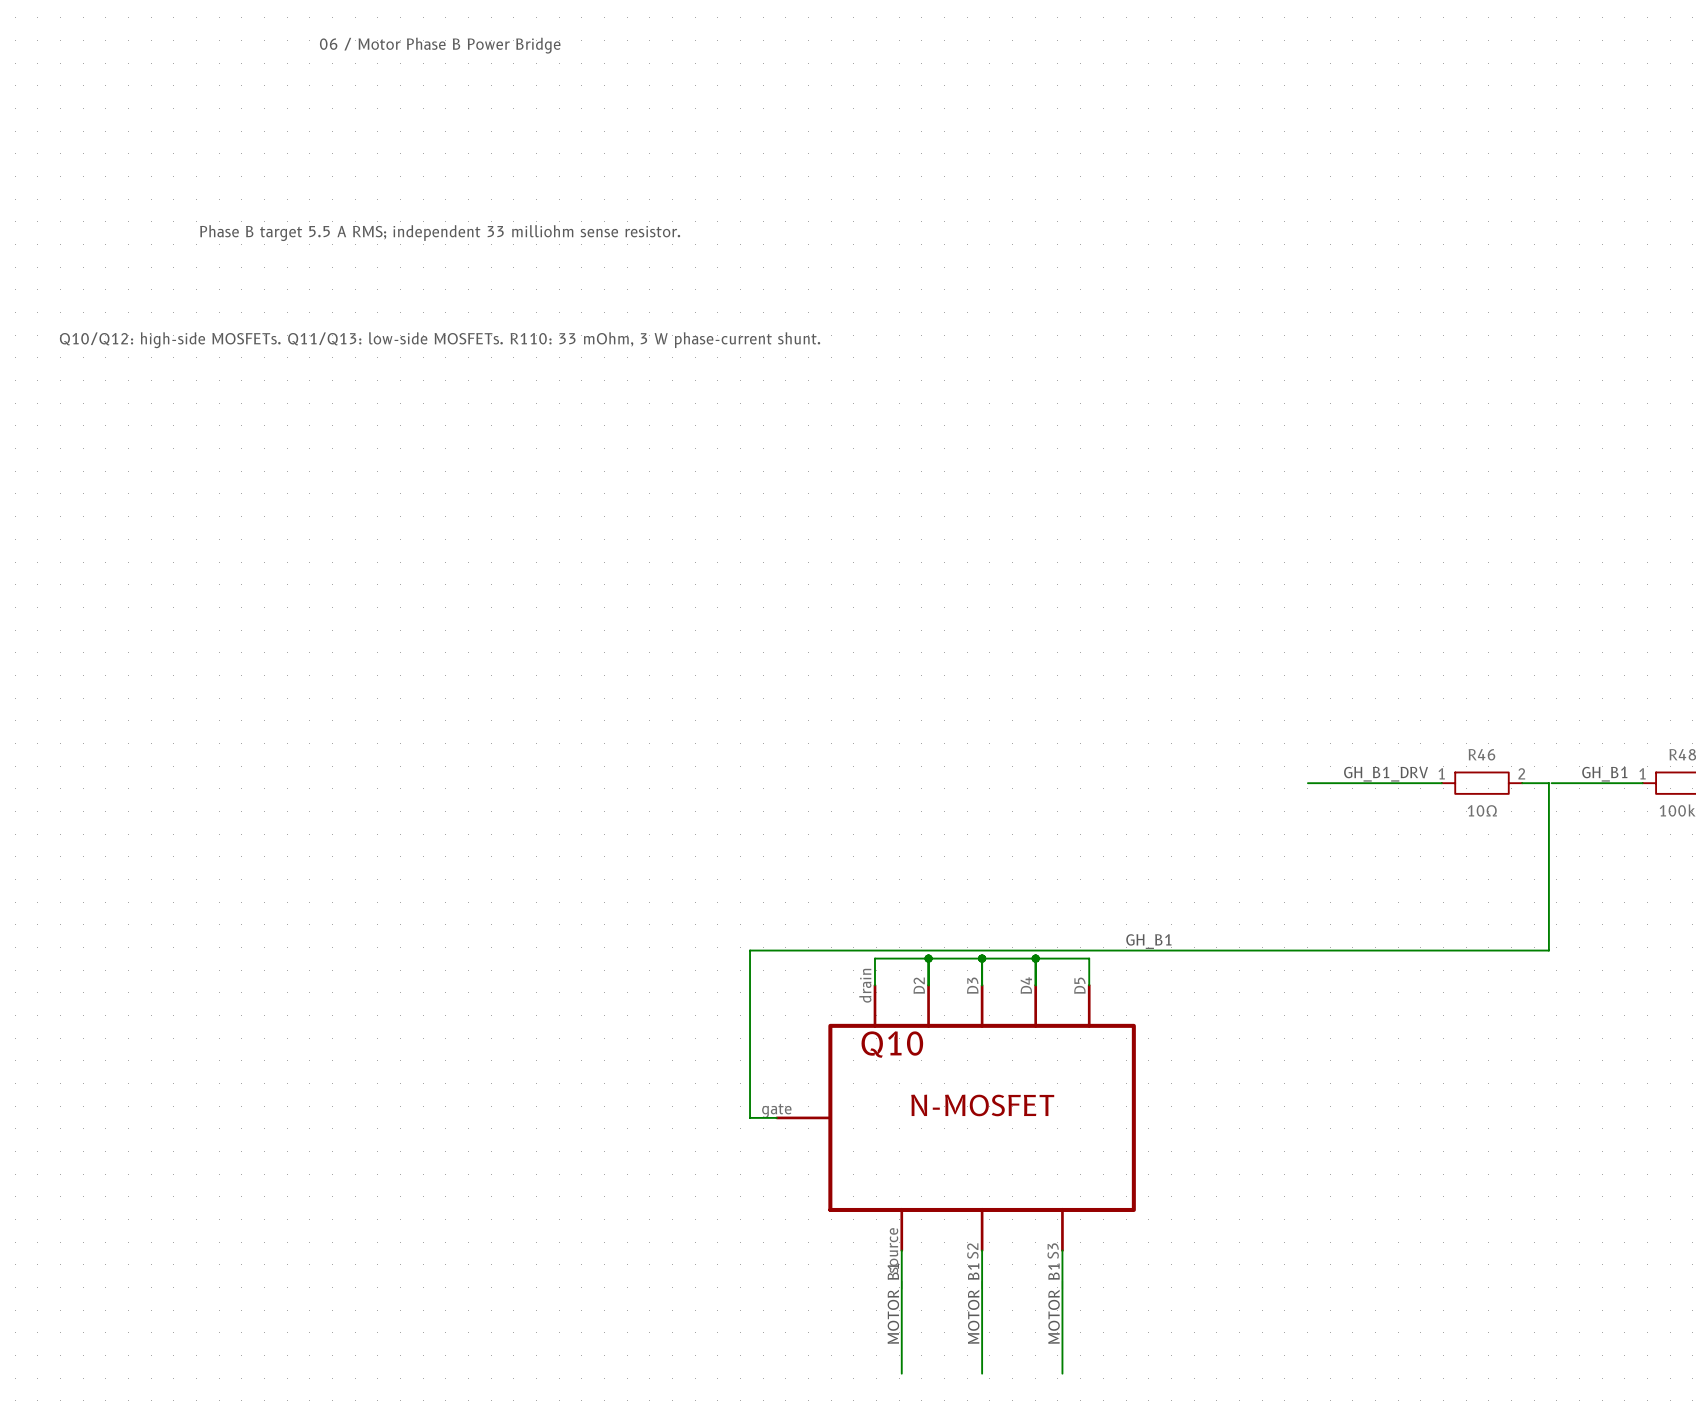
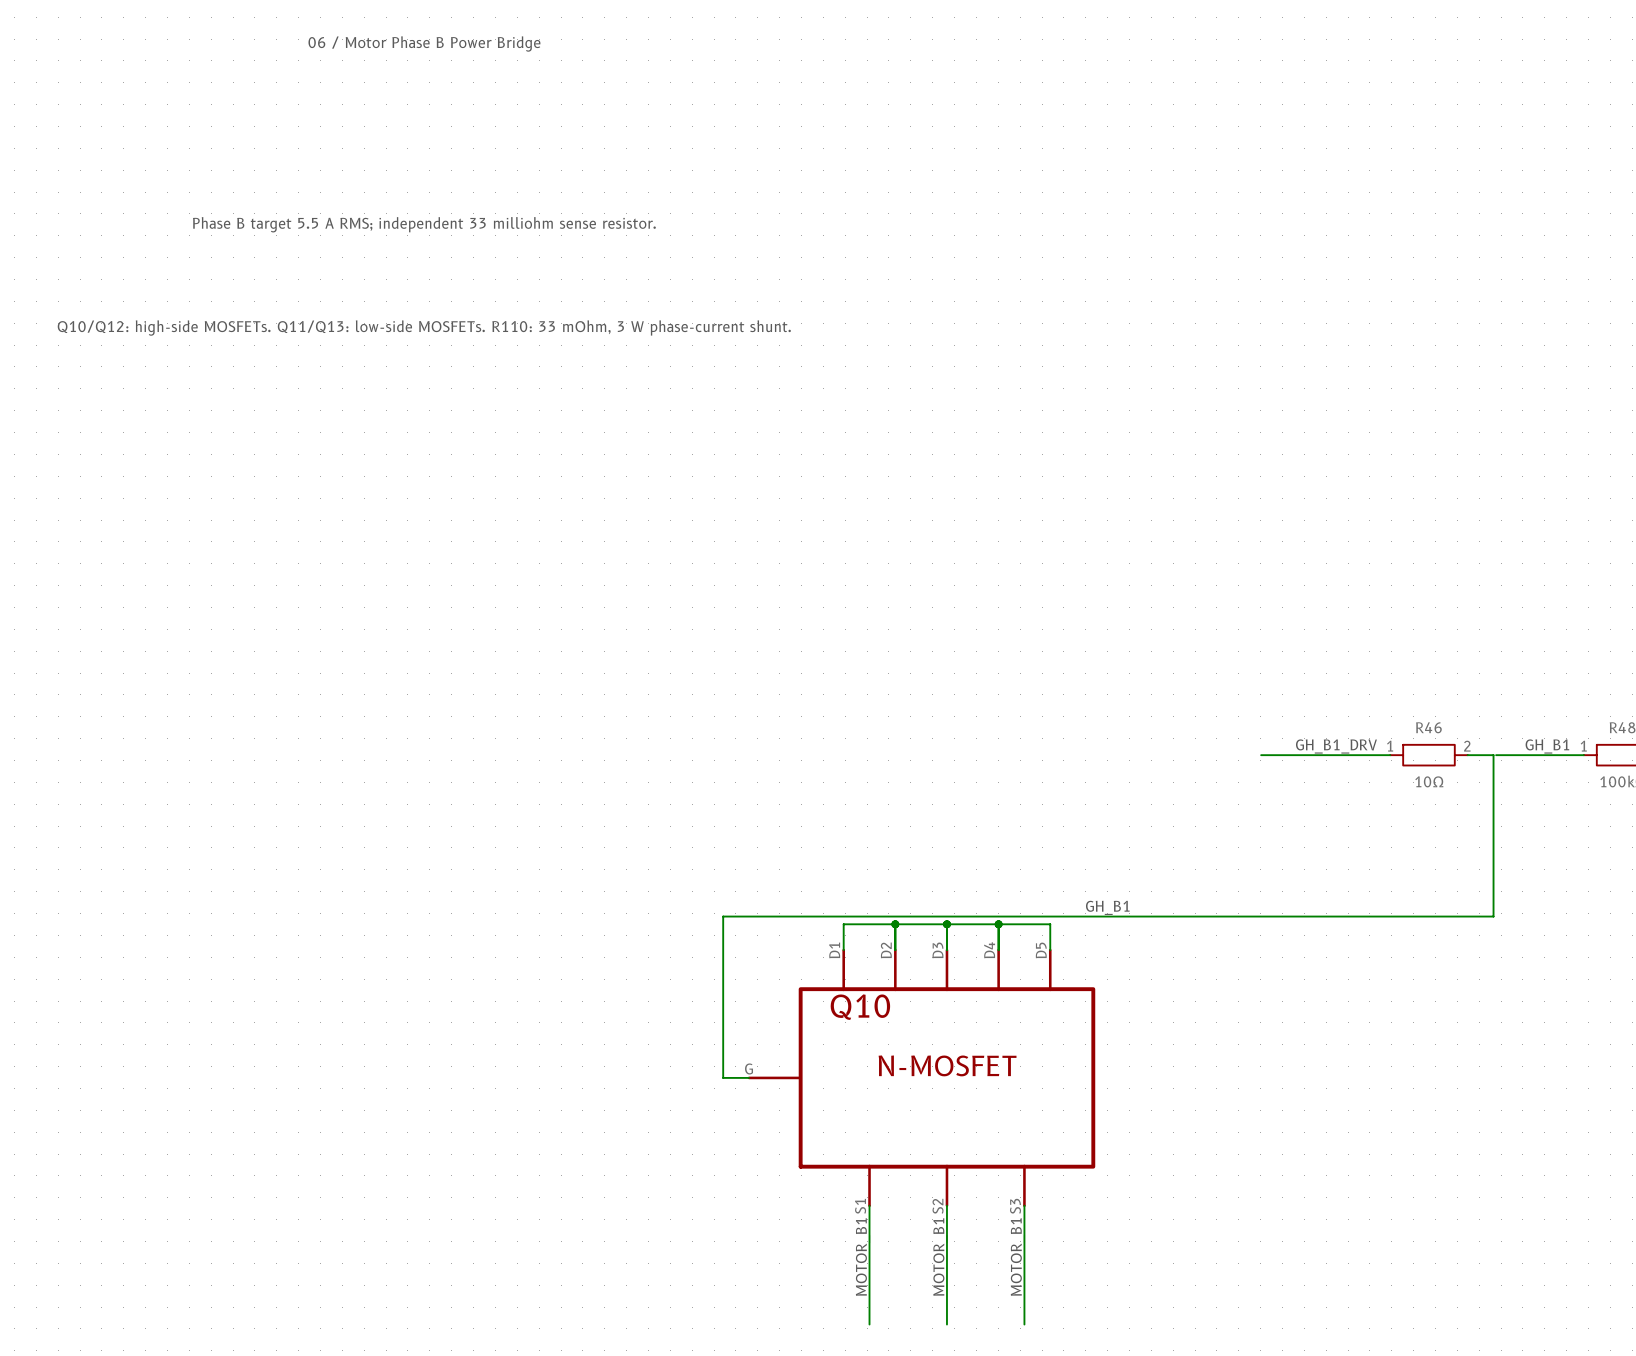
part pin name: drain (865, 985) -> D1 (834, 950)
part pin name: gate (776, 1110) -> G (749, 1068)
part pin name: source (893, 1250) -> S1 (860, 1206)

